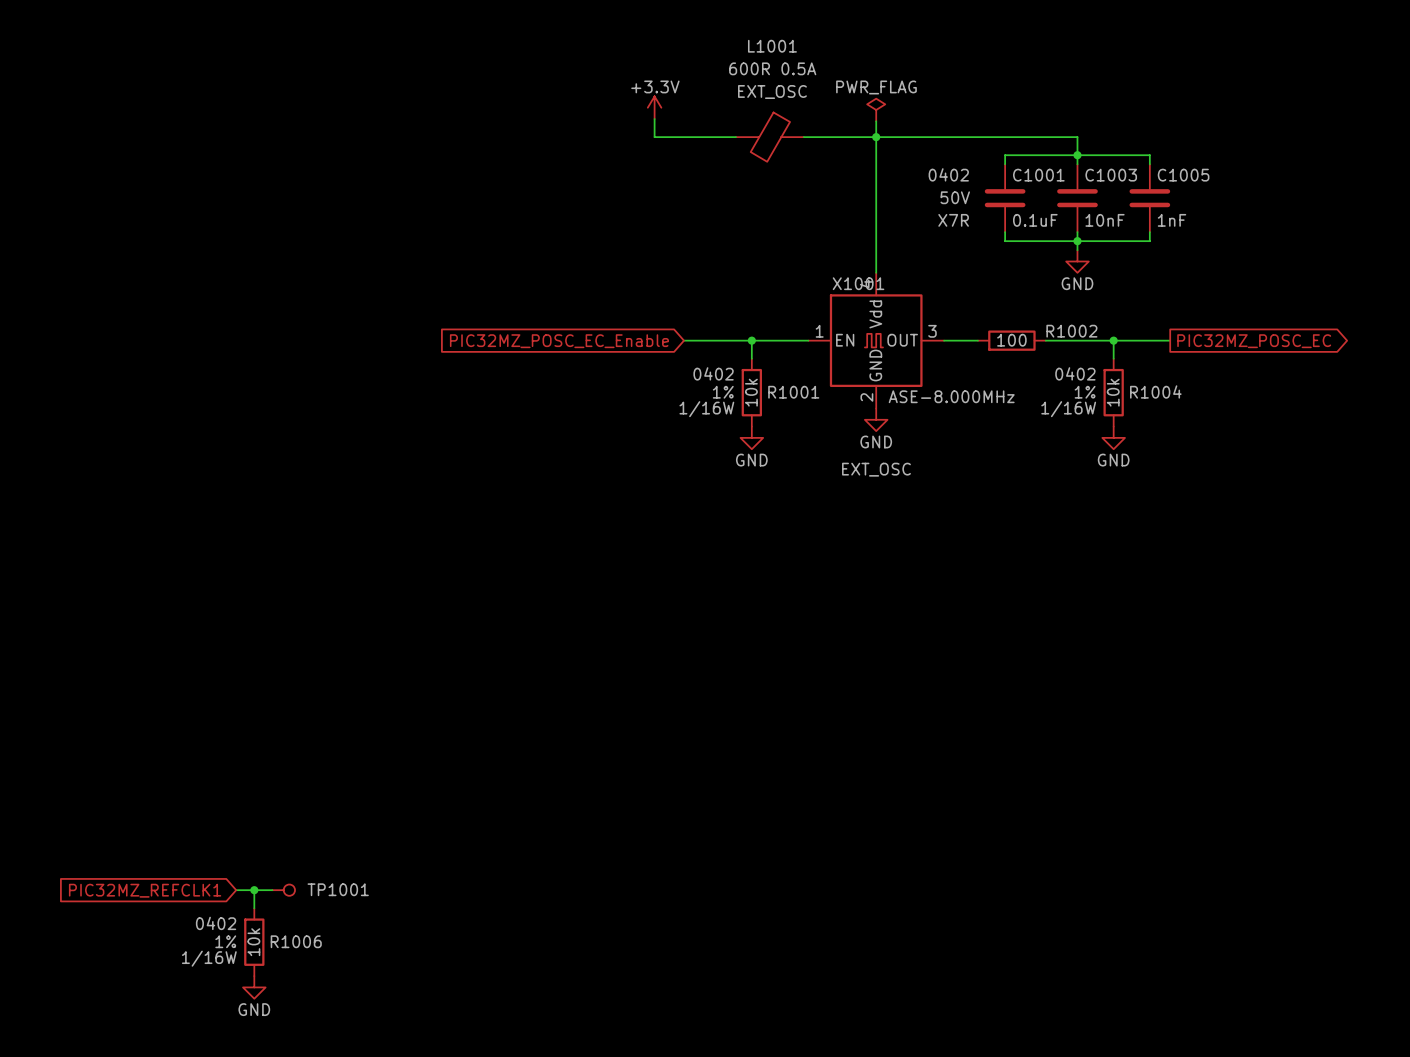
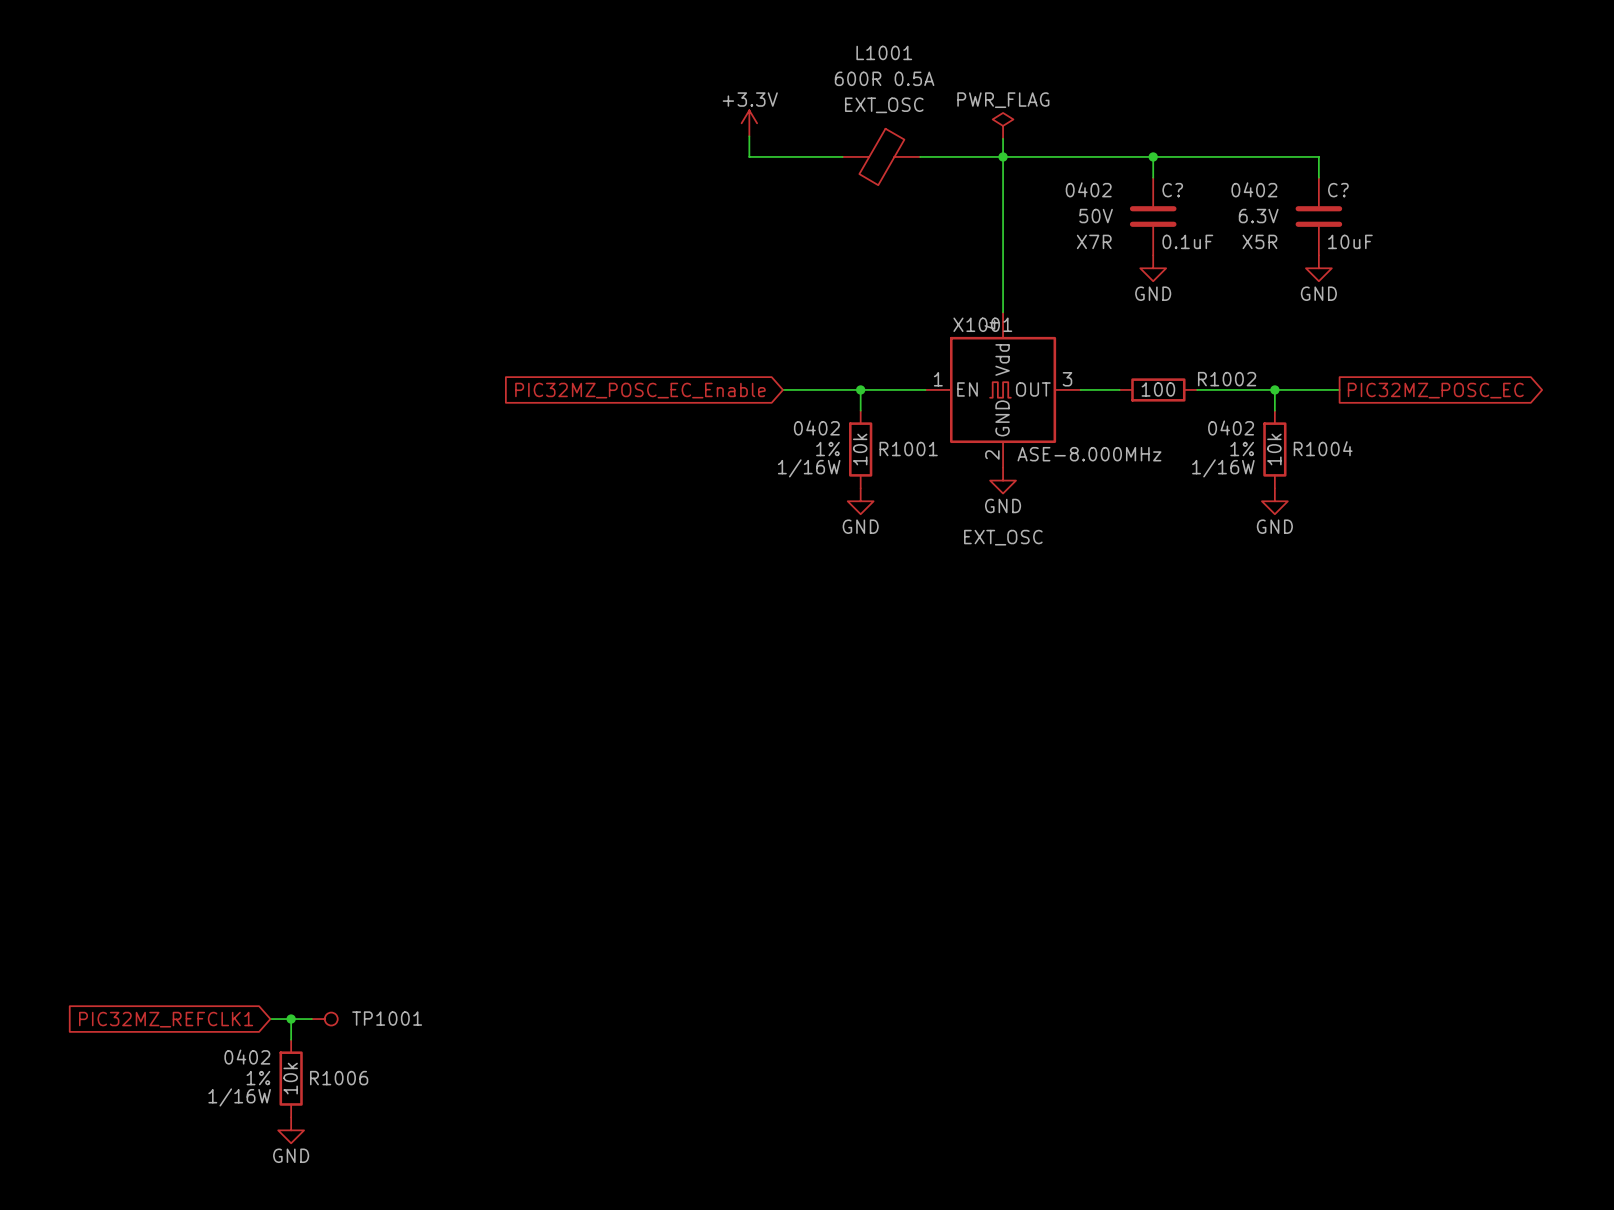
junction: none -> (1153, 156)
wire: (1077, 137) (1077, 164) -> (1233, 156) (1318, 156) (1318, 177)
junction: (1077, 155) -> none
wire: (1005, 164) (1005, 155) (1149, 155) (1149, 164) -> none
C?: none -> 0.1uF (1153, 216)
C?: none -> 10uF (1318, 216)
C1001: 0.1uF (1005, 198) -> none
C1003: 10nF (1077, 198) -> none
C1005: 1nF (1149, 198) -> none
wire: (1005, 232) (1005, 241) (1149, 241) (1149, 232) -> none
wire: (1077, 232) (1077, 250) -> (1153, 156) (1153, 177)
power symbol: none -> GND (1153, 268)
power symbol: none -> GND (1318, 268)
junction: (1077, 241) -> none
power symbol: GND (1077, 261) -> none

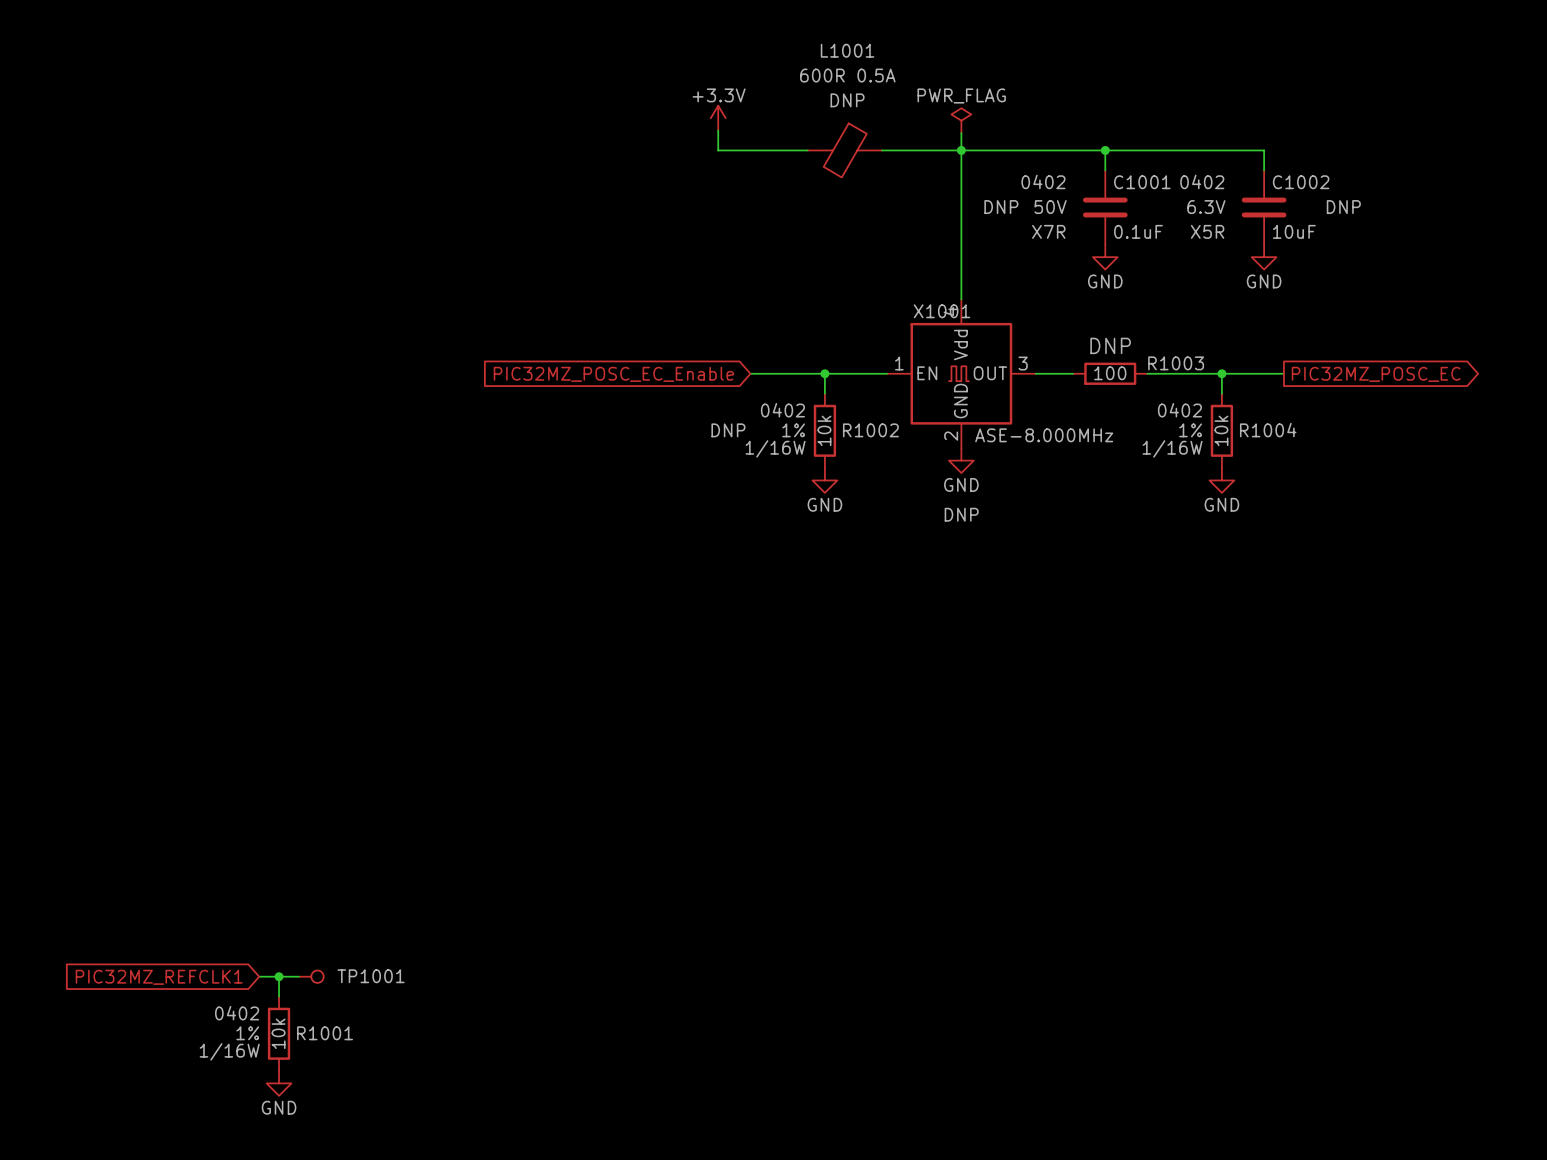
L1001 text: EXT_OSC (884, 105) -> DNP (847, 100)
C? name: C? (1172, 190) -> C1001 (1142, 182)
C? name: C? (1338, 190) -> C1002 (1301, 182)
C? text: none -> DNP (1001, 207)
C? text: none -> DNP (1343, 207)
R1002 text: none -> DNP (1110, 345)
R1002 name: R1002 (1227, 379) -> R1003 (1176, 363)
R1001 text: none -> DNP (728, 430)
R1001 name: R1001 (908, 449) -> R1002 (870, 430)
X1001 text: EXT_OSC (1003, 537) -> DNP (961, 514)
R1006 name: R1006 (339, 1078) -> R1001 (325, 1033)

